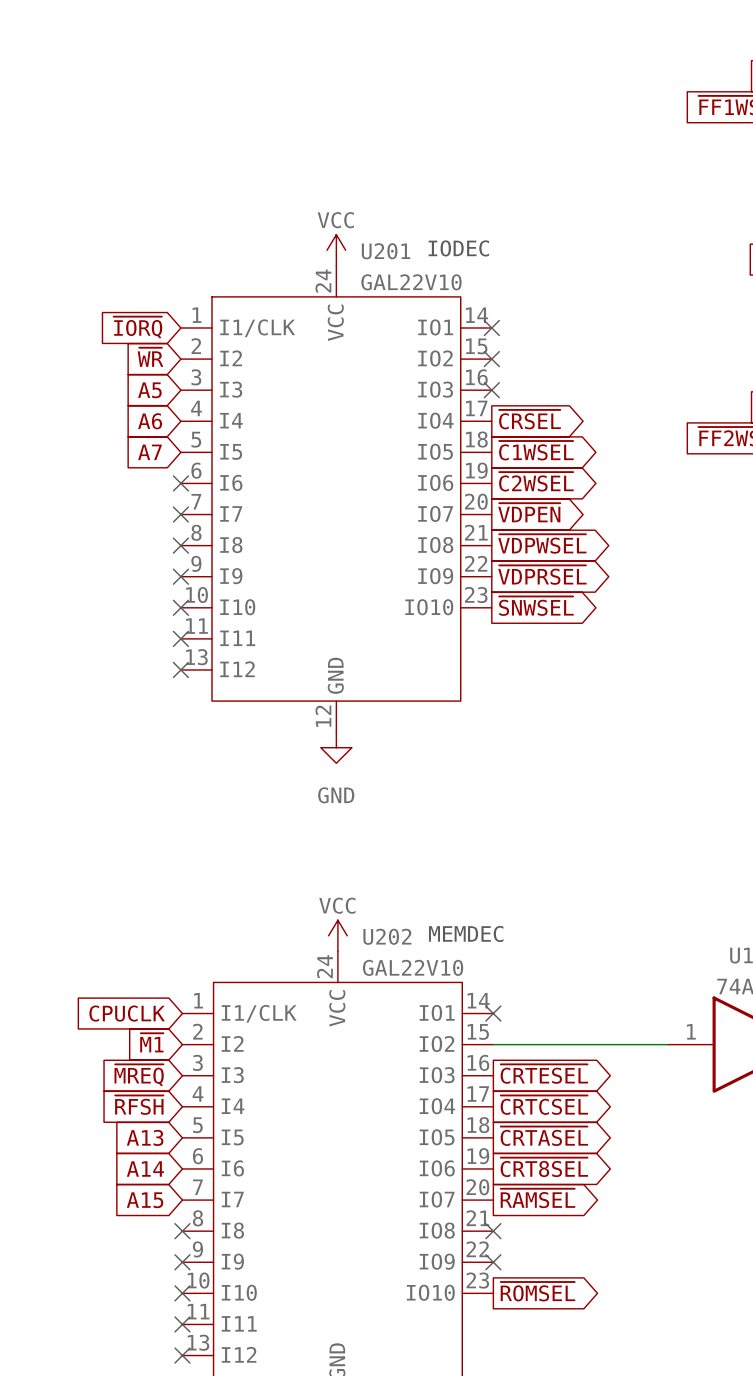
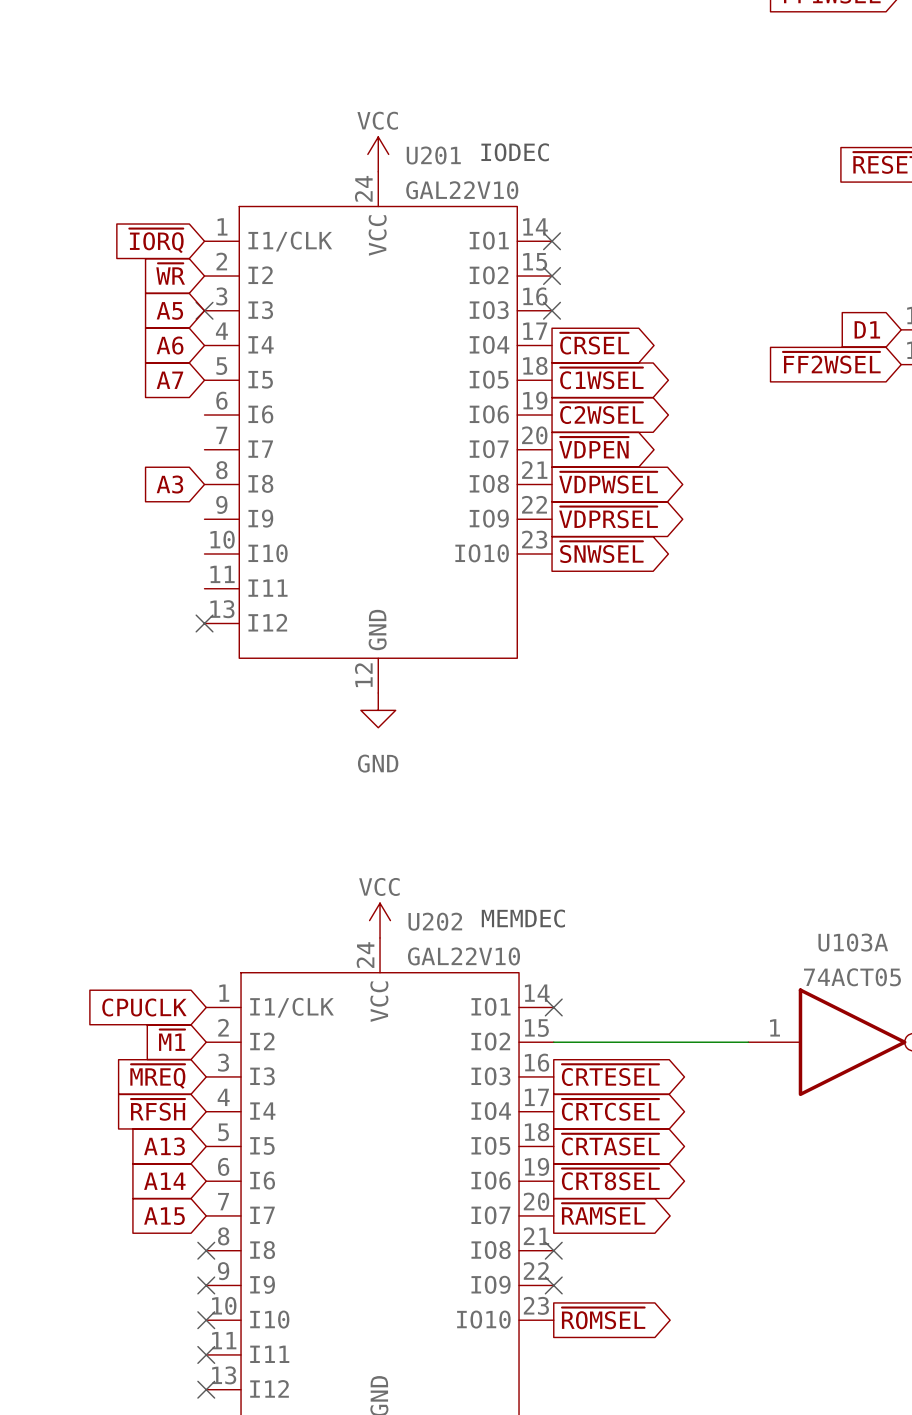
no-connect mark: none -> (204, 310)
no-connect mark: (180, 483) -> none
no-connect mark: (180, 514) -> none
global label: none -> A3 (169, 484)
no-connect mark: (180, 545) -> none
no-connect mark: (180, 576) -> none
no-connect mark: (180, 607) -> none
no-connect mark: (180, 638) -> none

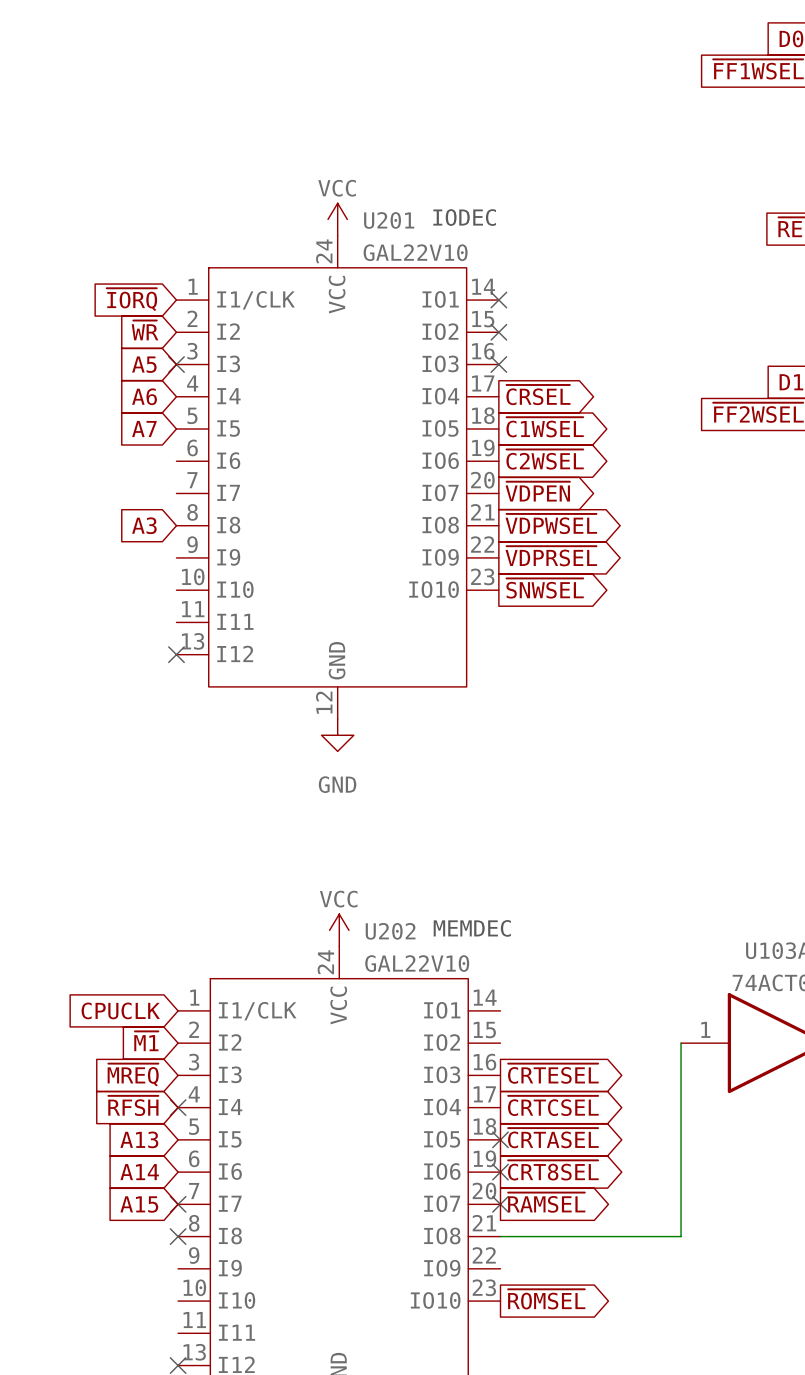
no-connect mark: (553, 1007) -> none
wire: (553, 1042) (748, 1042) -> (500, 1236) (681, 1236) (681, 1043)
no-connect mark: none -> (178, 1107)
no-connect mark: none -> (500, 1139)
no-connect mark: none -> (500, 1172)
no-connect mark: none -> (178, 1204)
no-connect mark: none -> (500, 1204)
no-connect mark: (553, 1250) -> none
no-connect mark: (206, 1285) -> none
no-connect mark: (553, 1285) -> none
no-connect mark: (206, 1320) -> none
no-connect mark: (206, 1354) -> none

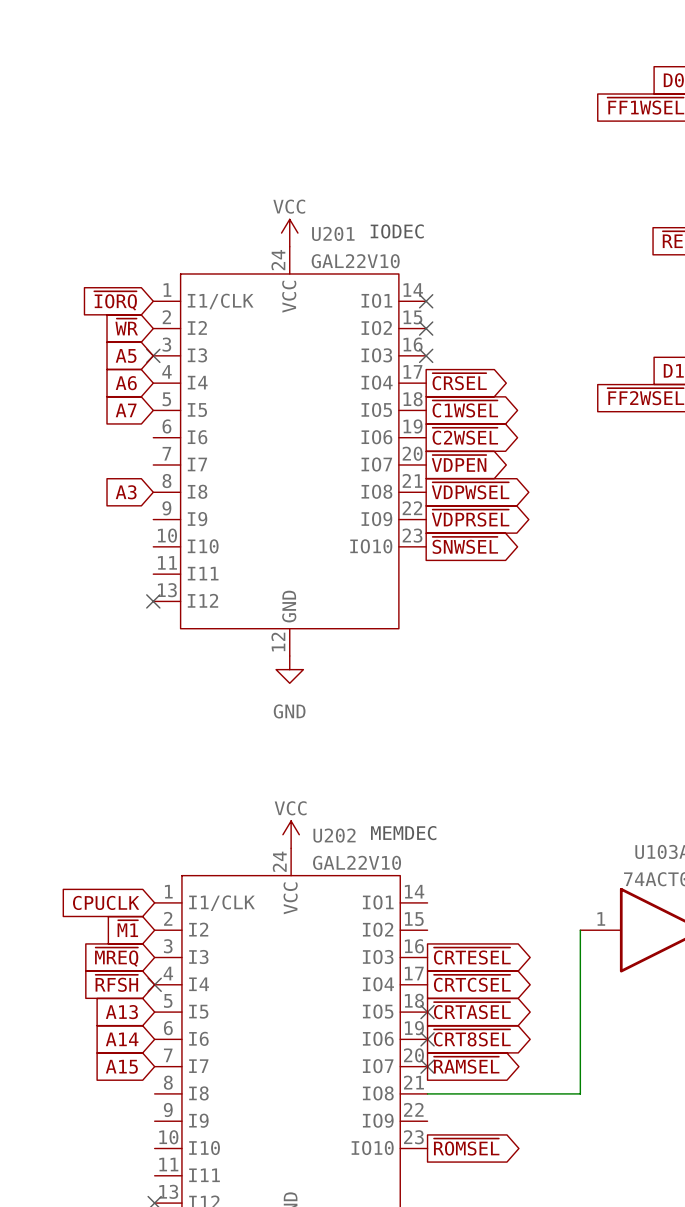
no-connect mark: (178, 1204) -> none
no-connect mark: (178, 1236) -> none

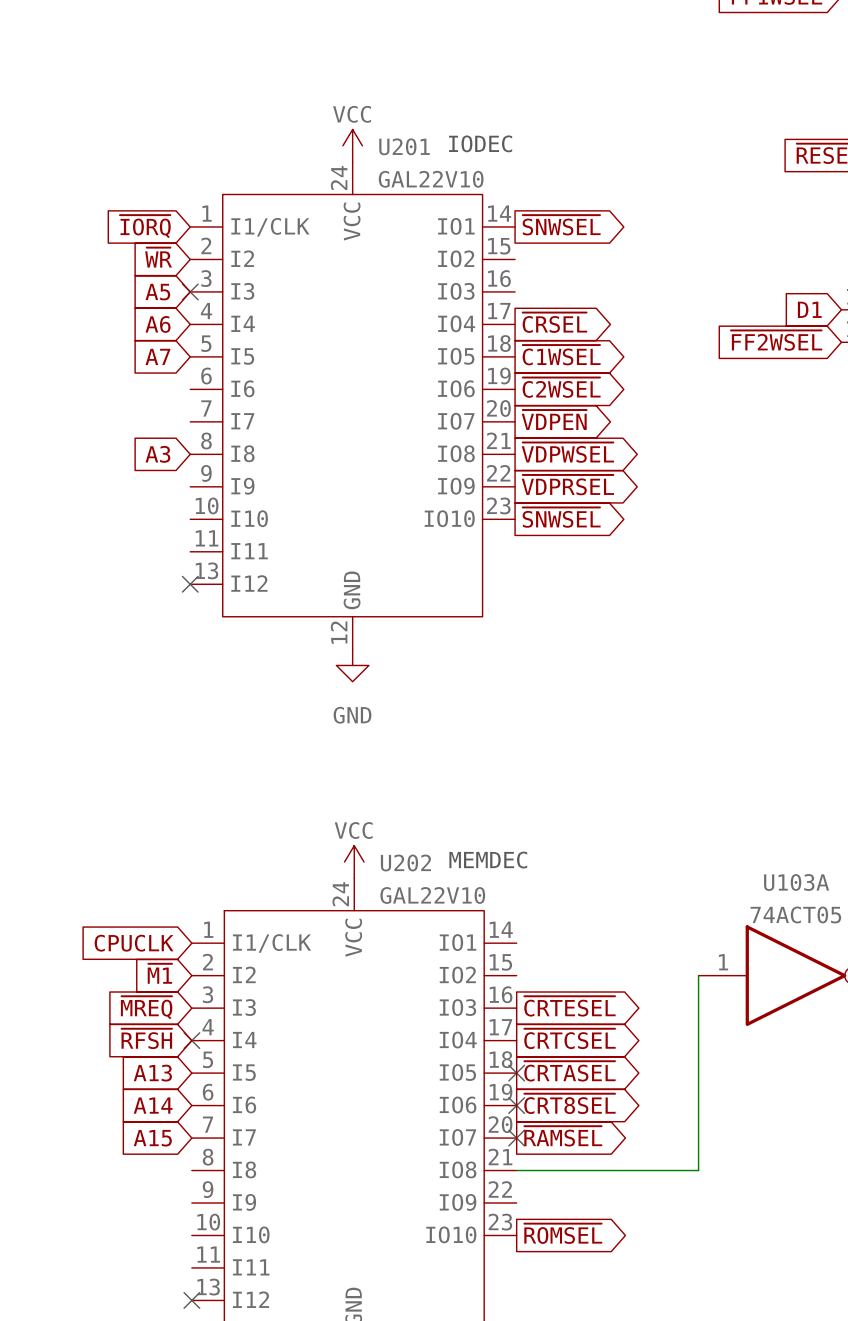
global label: none -> ~{SNWSEL} (561, 225)
no-connect mark: (426, 301) -> none
no-connect mark: (426, 328) -> none
no-connect mark: (426, 355) -> none

